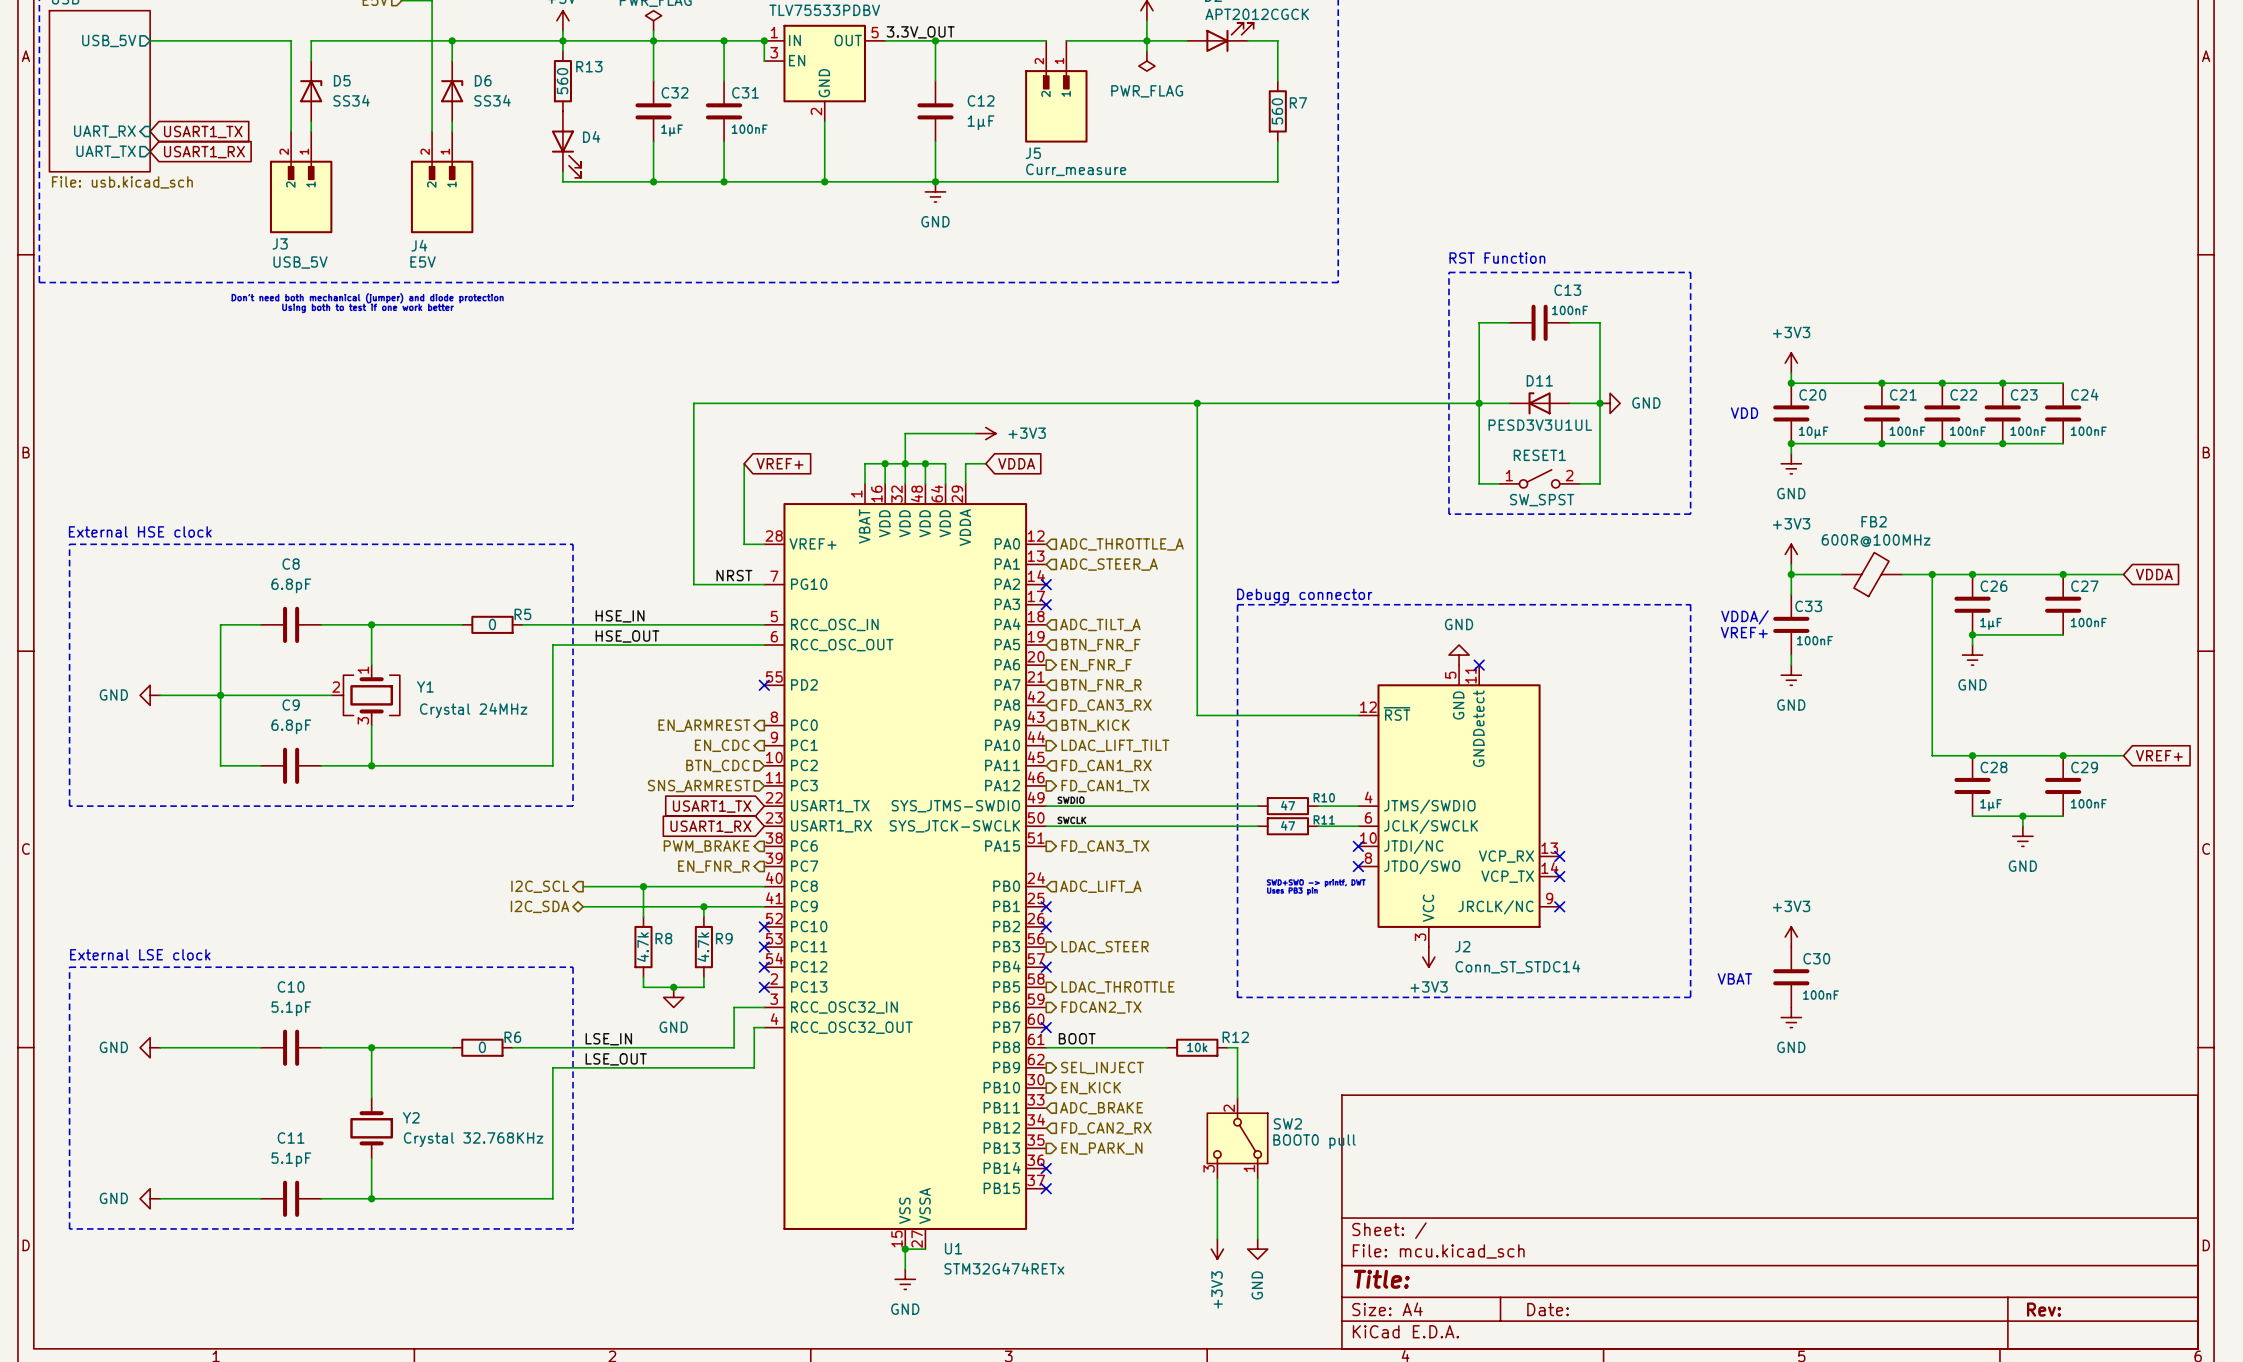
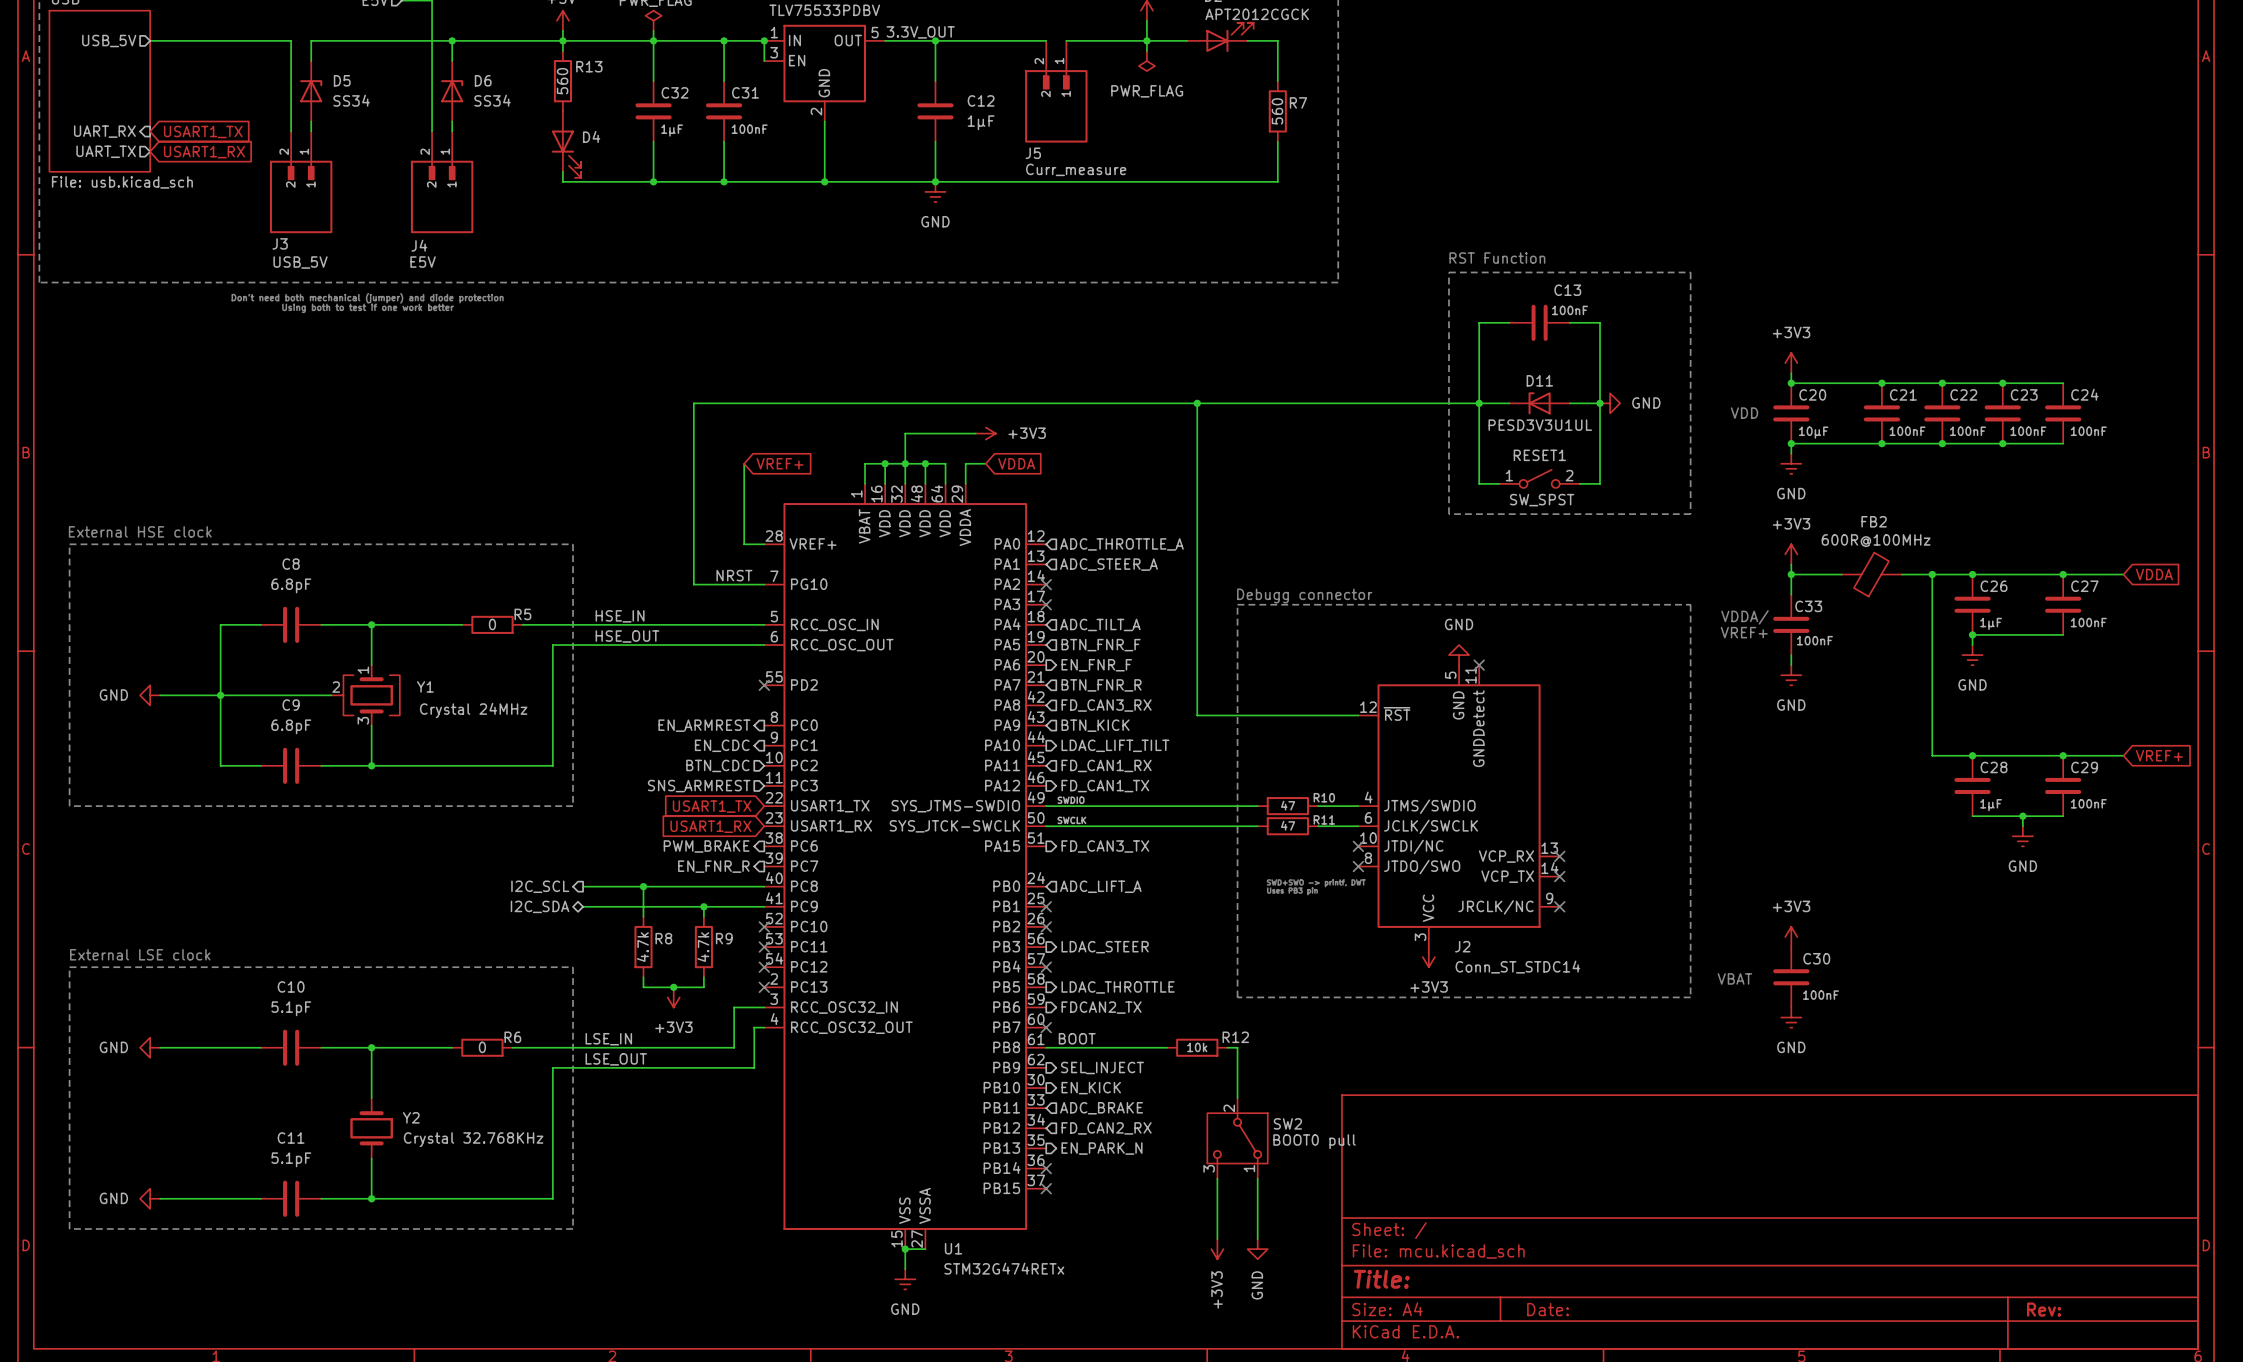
power symbol: GND (673, 997) -> +3V3 (673, 997)

